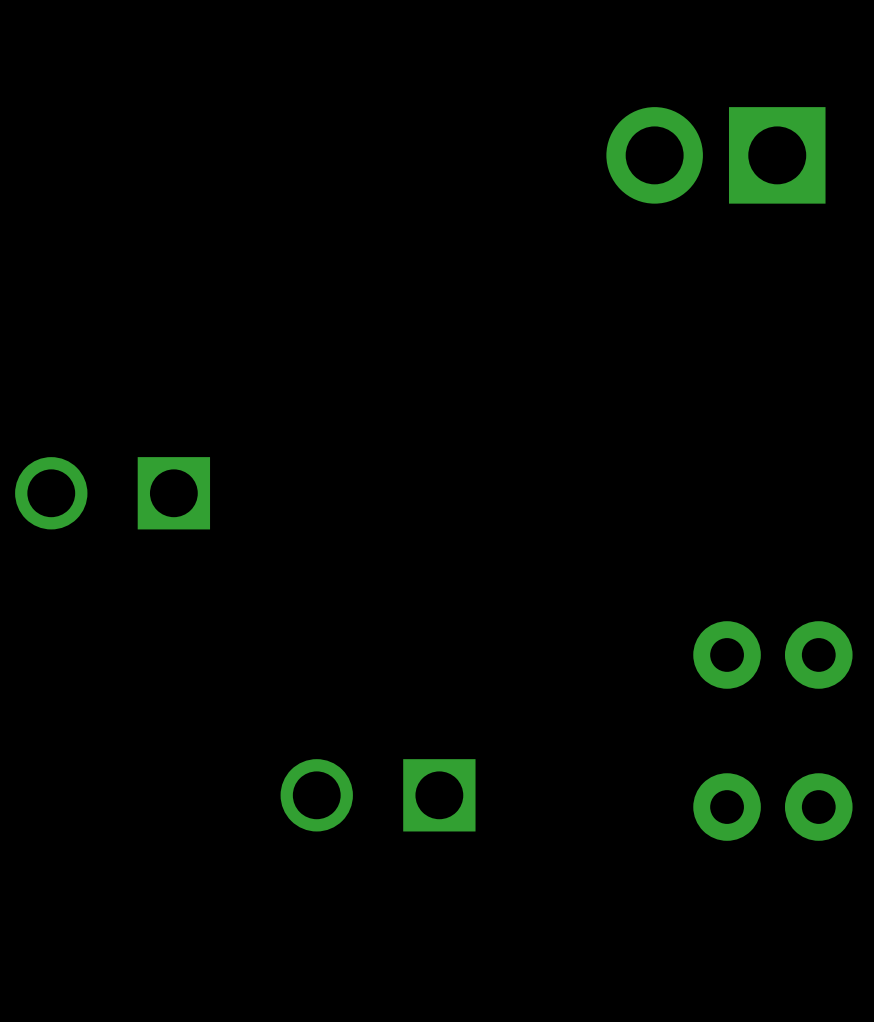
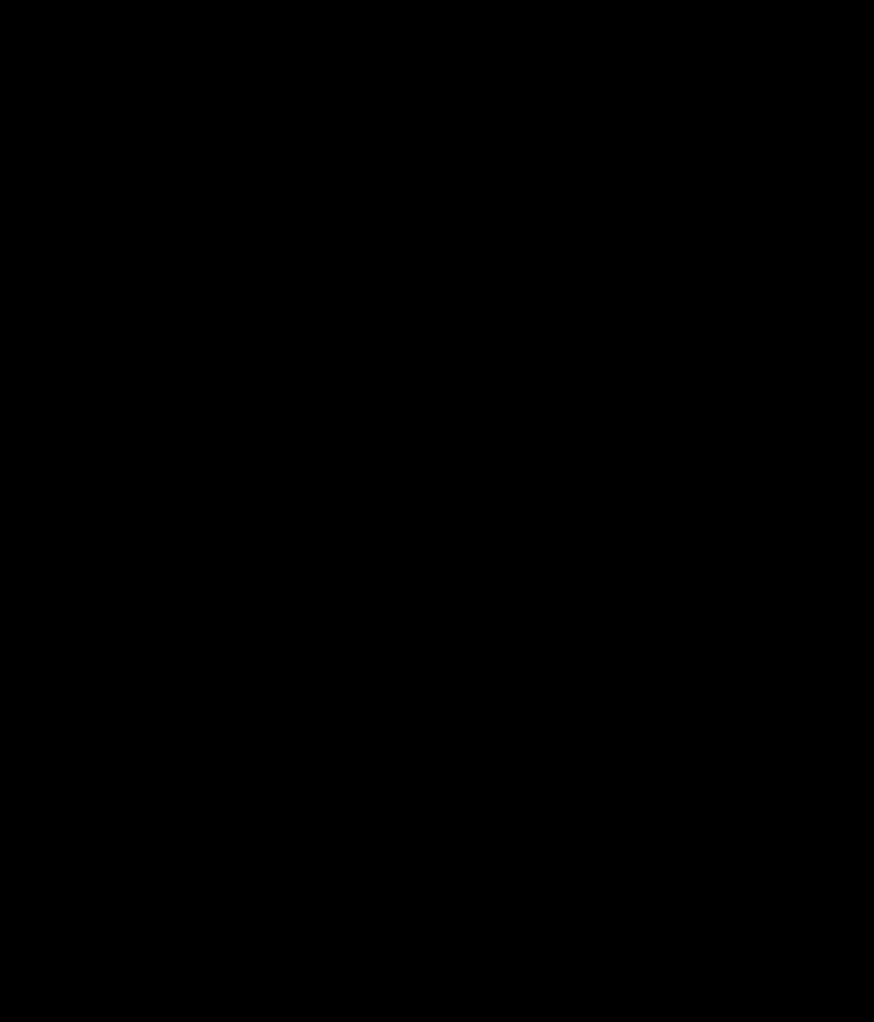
part: (715, 155) -> none
part: (112, 493) -> none
part: (772, 654) -> none
part: (378, 795) -> none
part: (772, 807) -> none

